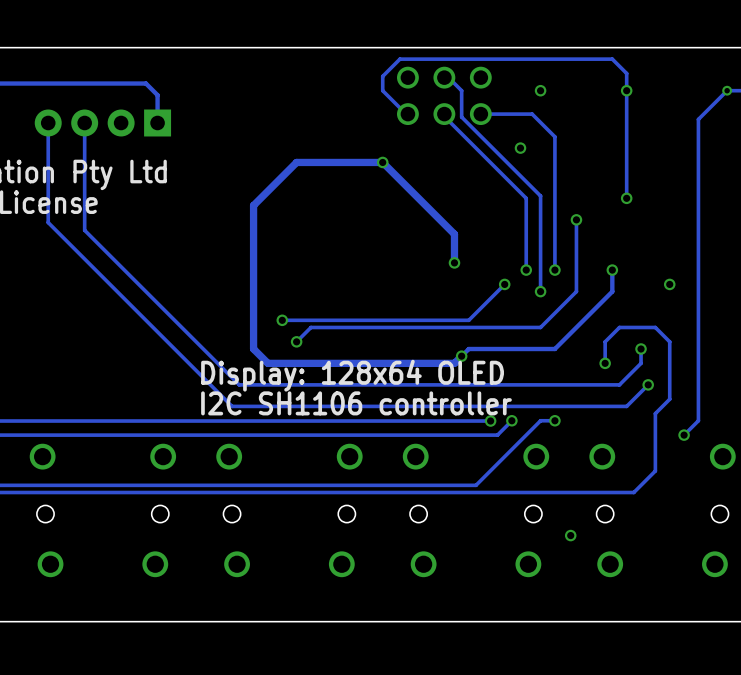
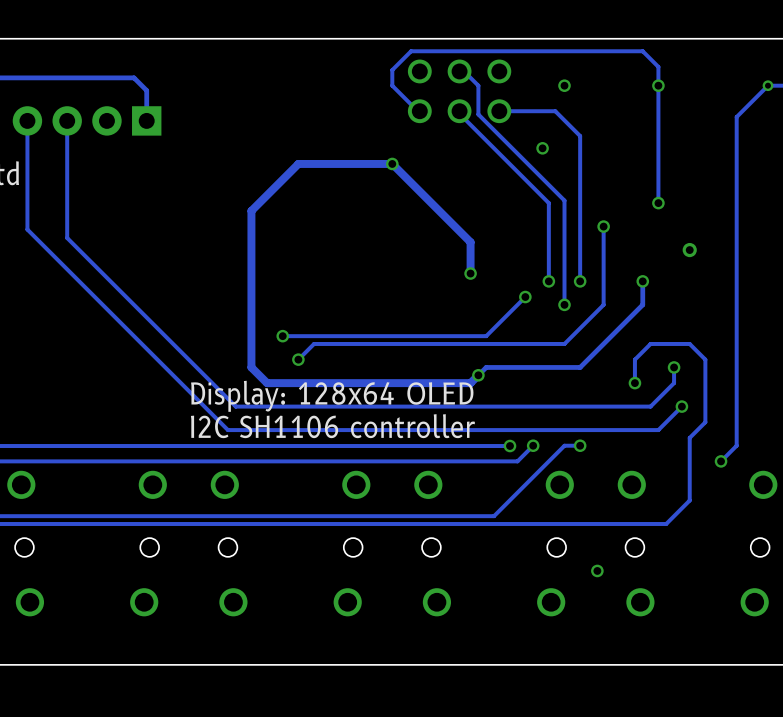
via: none -> (689, 250)
via: (669, 284) -> none

